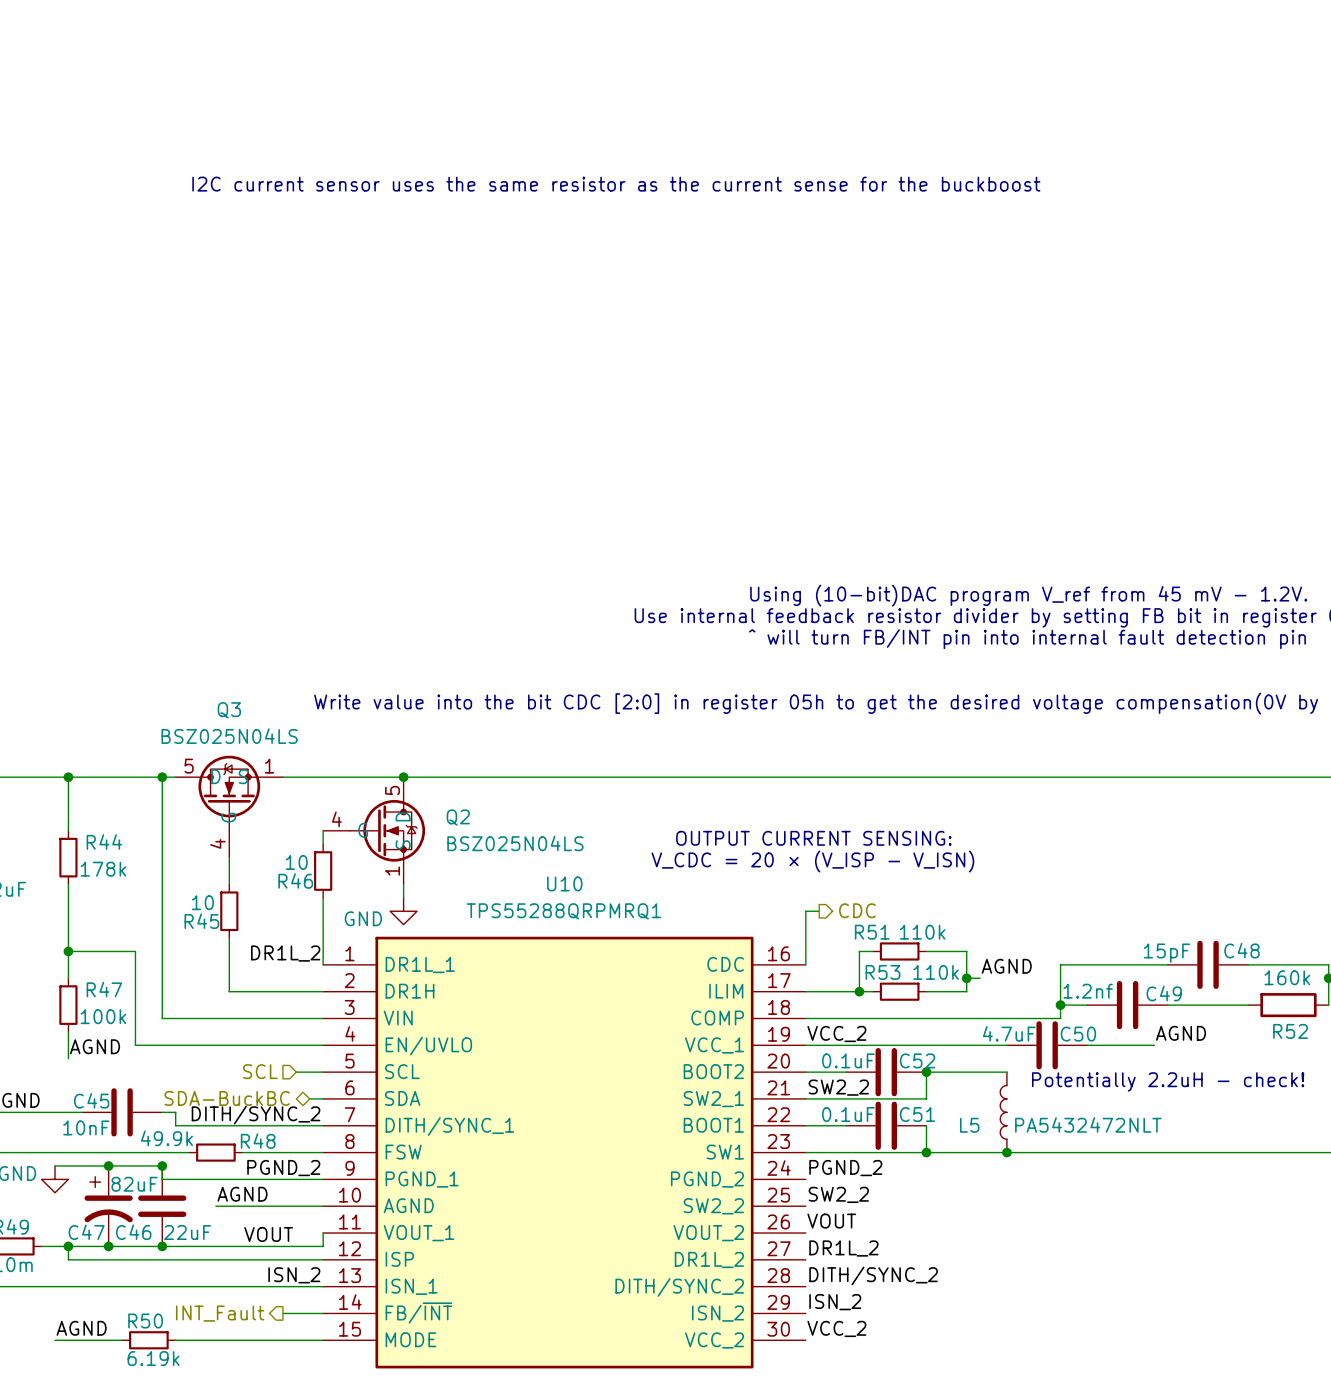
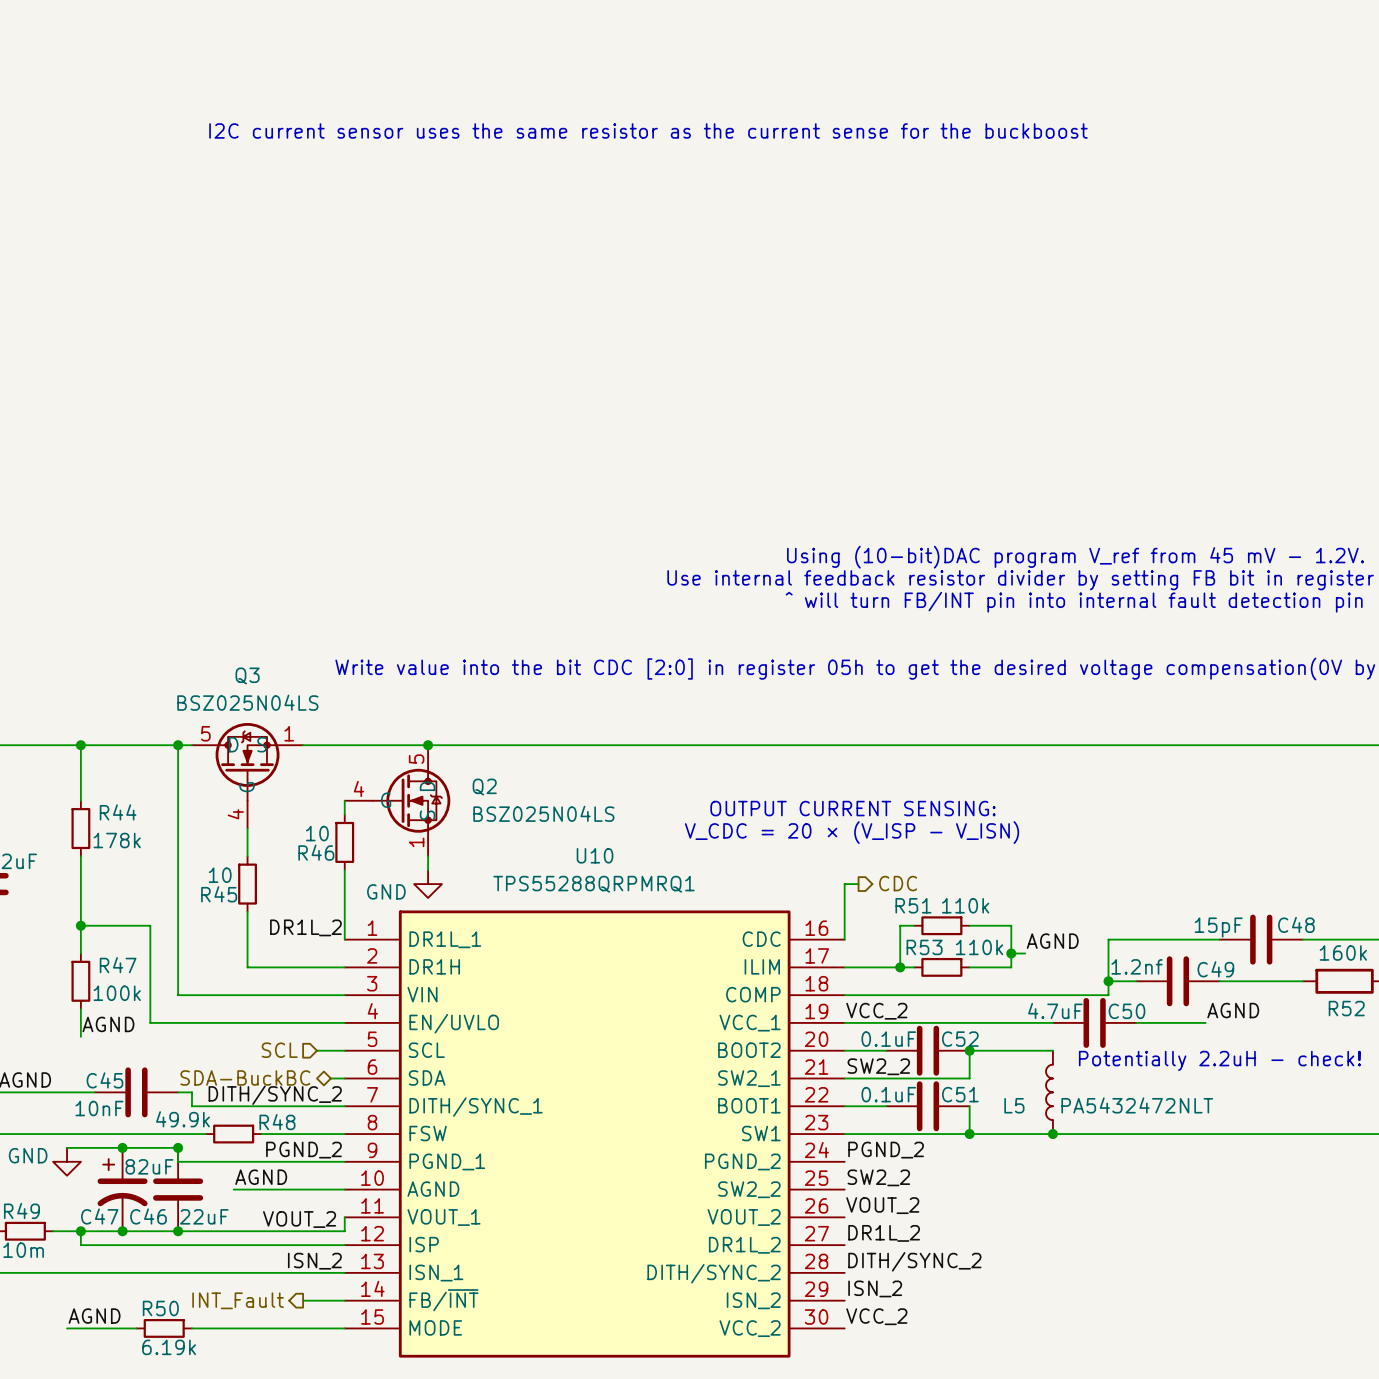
label: VOUT (831, 1221) -> VOUT_2 (882, 1205)
label: VOUT (268, 1234) -> VOUT_2 (299, 1219)

